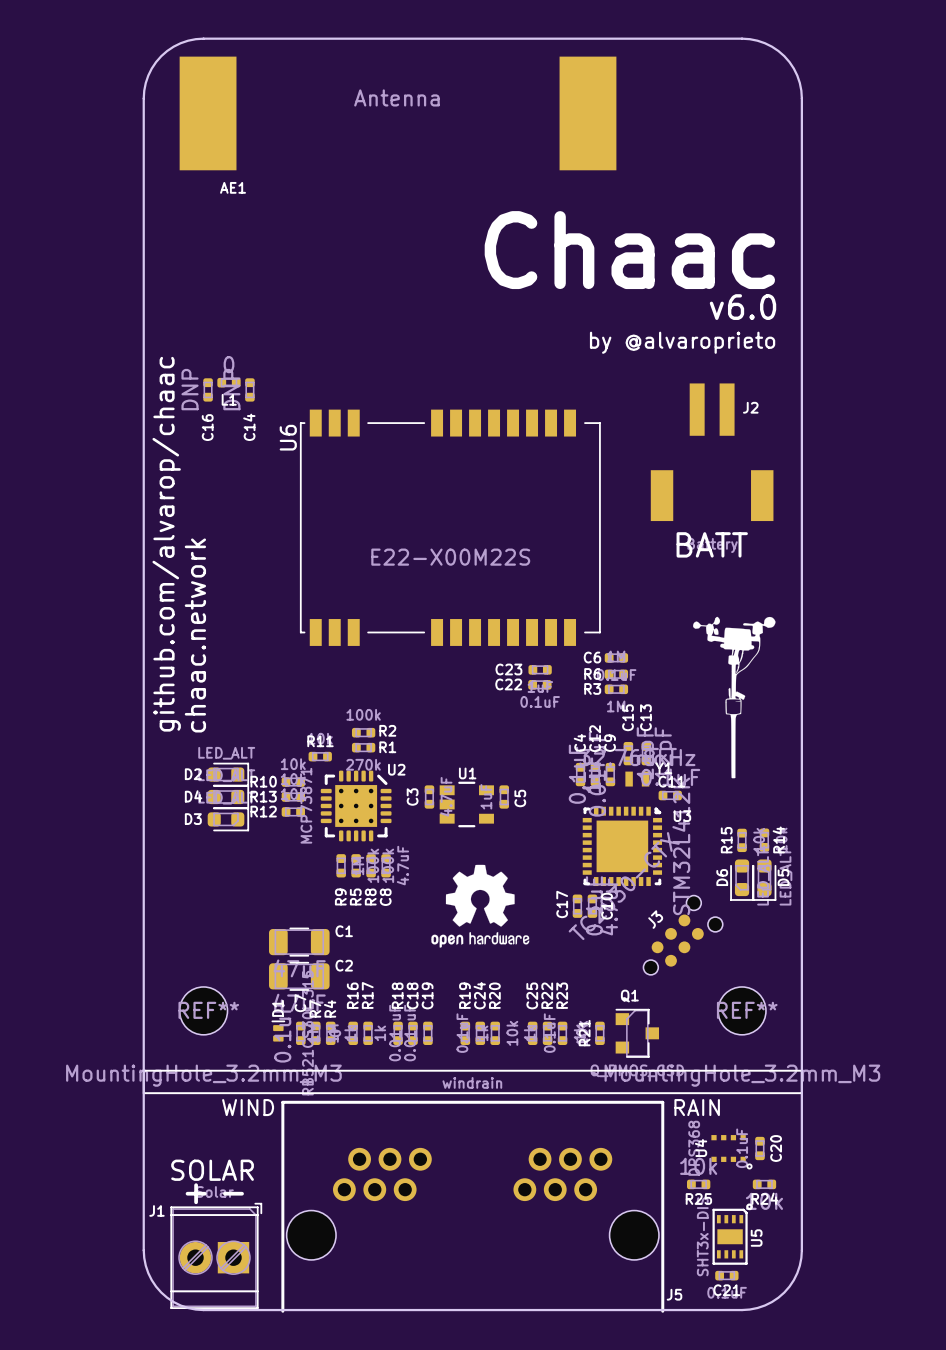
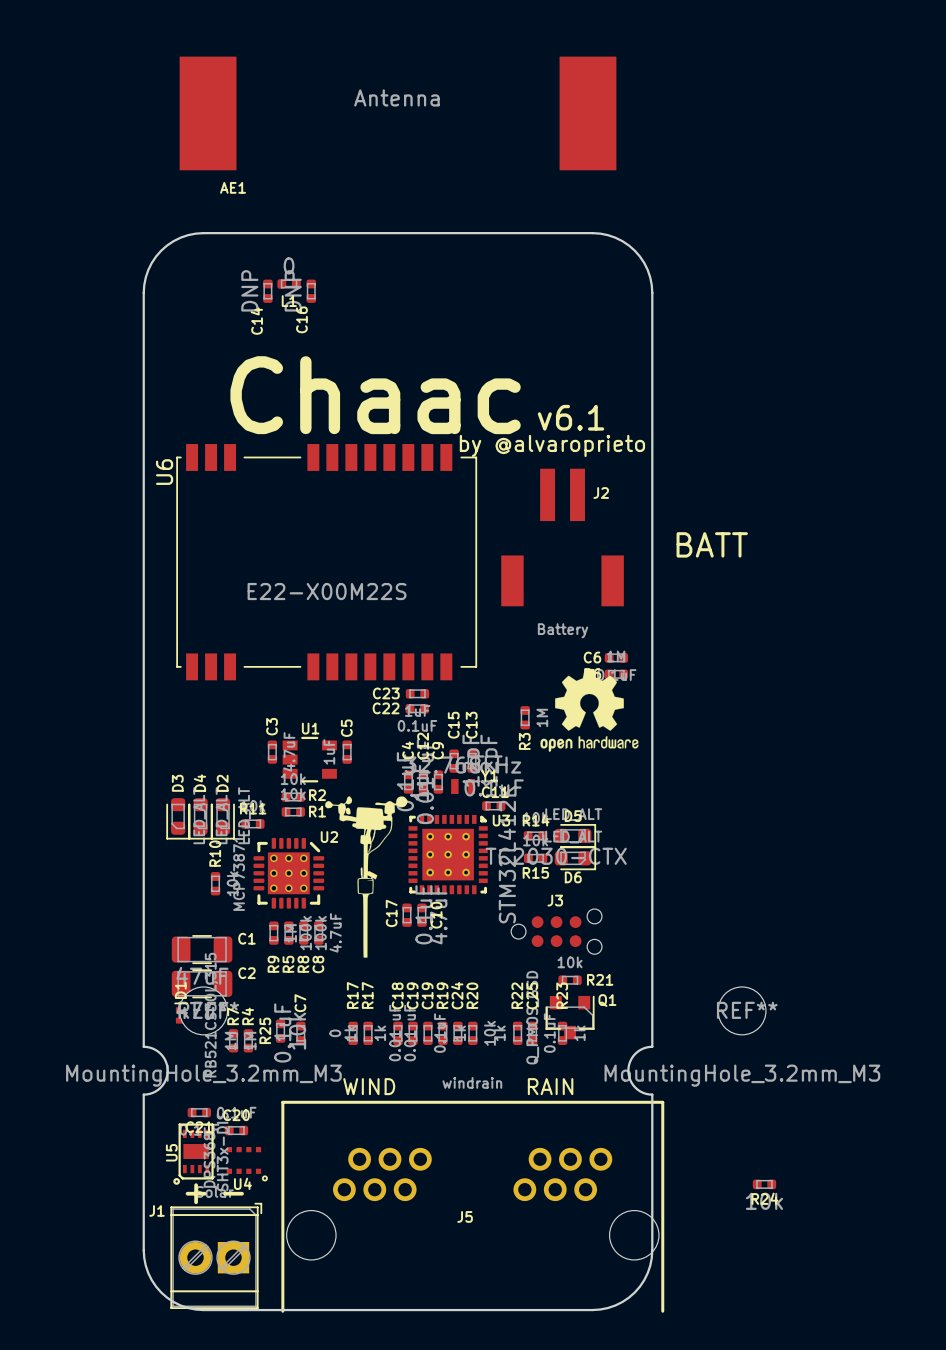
text position: Chaac (629, 250) -> Chaac (375, 395)
board edge: (143, 292) (144, 90) (148, 75) (156, 62) (167, 51) (188, 40) (203, 38) (742, 38) (757, 40) (778, 51) (789, 62) (797, 75) (801, 98) (801, 1258) (797, 1273) (789, 1286) (771, 1302) (757, 1308) (742, 1310) (592, 1310) -> (143, 292) (148, 270) (161, 250) (180, 237) (203, 233) (600, 233) (615, 237) (628, 245) (639, 256) (647, 270) (652, 292) (652, 1046) (643, 1048) (635, 1053) (630, 1061) (628, 1070) (630, 1079) (635, 1087) (643, 1092) (652, 1094) (652, 1250) (647, 1273) (634, 1292) (615, 1305) (592, 1310)
text: v6.0 (743, 307) -> none
text position: by @alvaroprieto (682, 342) -> by @alvaroprieto (552, 445)
L1 position: (229, 382) -> (289, 283)
C16 position: (208, 389) -> (311, 291)
C14 position: (249, 389) -> (267, 291)
text: none -> v6.1 (570, 417)
C16 name position: C16 (207, 427) -> C16 (301, 319)
C14 name position: C14 (249, 427) -> C14 (256, 321)
J2 position: (712, 452) -> (562, 537)
U6 position: (450, 527) -> (326, 562)
text: github.com/alvarop/chaac (166, 544) -> none
drawing: [693, 616, 776, 779] -> none
text: chaac.network (195, 635) -> none
C23 position: (540, 669) -> (417, 693)
C22 position: (539, 684) -> (417, 708)
R3 name position: R3 (592, 688) -> R3 (524, 741)
R3 rotation: 0° (616, 689) -> 90° clockwise (525, 717)
R3 position: (616, 689) -> (525, 717)
R2: 100k (363, 732) -> none
R1: 270k (363, 747) -> none
C15 position: (628, 753) -> (454, 761)
C13 position: (646, 753) -> (472, 761)
R11 position: (320, 756) -> (252, 823)
D2 rotation: 0° (228, 774) -> 90° clockwise (223, 818)
D2 position: (228, 774) -> (223, 818)
C4 position: (580, 774) -> (408, 782)
C12 position: (595, 774) -> (423, 782)
C9 position: (610, 774) -> (438, 782)
Y1 position: (637, 779) -> (463, 786)
R10 rotation: 0° (293, 782) -> 90° clockwise (215, 883)
R10 position: (293, 782) -> (215, 883)
C11 position: (670, 795) -> (493, 805)
R13 name: R13 (263, 796) -> R2 (317, 795)
drawing: none -> [325, 796, 408, 958]
D4 rotation: 0° (228, 797) -> 90° clockwise (200, 818)
D4 position: (228, 797) -> (200, 818)
C3 name position: C3 (412, 797) -> C3 (272, 726)
C3 position: (429, 797) -> (272, 752)
C5 position: (504, 797) -> (347, 752)
C5 name position: C5 (520, 798) -> C5 (346, 728)
U1 position: (466, 804) -> (309, 759)
U2 position: (356, 805) -> (288, 873)
U3 footprint: [582, 806, 663, 887] -> [408, 814, 488, 895]
R12 name: R12 (263, 811) -> R1 (317, 811)
D3 rotation: 0° (228, 819) -> 90° clockwise (178, 818)
D3 position: (228, 819) -> (178, 818)
R15 rotation: 0° (742, 840) -> 90° clockwise (535, 858)
R15 position: (742, 840) -> (535, 858)
R14 rotation: 0° (764, 840) -> 90° clockwise (535, 835)
R14 position: (764, 840) -> (535, 835)
R9 position: (341, 865) -> (273, 933)
R5 position: (356, 865) -> (288, 933)
R8 position: (371, 865) -> (303, 933)
C8 position: (386, 865) -> (318, 933)
D6 rotation: 0° (742, 880) -> 90° counterclockwise (575, 858)
D6 position: (742, 880) -> (575, 858)
D5 rotation: 0° (764, 880) -> 90° counterclockwise (575, 835)
D5 position: (764, 880) -> (575, 835)
drawing position: (480, 906) -> (589, 710)
C17 position: (577, 906) -> (406, 915)
C10 position: (592, 906) -> (421, 915)
J3 rotation: 0° (683, 935) -> 45° clockwise (556, 931)
J3 position: (683, 935) -> (556, 931)
C1 position: (299, 942) -> (202, 949)
C2 position: (299, 976) -> (202, 983)
R16 name: R16 (352, 995) -> R17 (352, 995)
R18 name: R18 (397, 995) -> C18 (397, 995)
C18 name: C18 (412, 995) -> C19 (412, 995)
D1 position: (278, 1031) -> (181, 1013)
R7 position: (315, 1033) -> (233, 1040)
R4 position: (330, 1033) -> (248, 1040)
R19 position: (465, 1033) -> (442, 1033)
C24 position: (480, 1033) -> (457, 1033)
R20 position: (495, 1033) -> (472, 1033)
R22 position: (547, 1033) -> (517, 1033)
R21 name position: R21 (584, 1033) -> R21 (600, 979)
R21 rotation: 0° (599, 1033) -> 90° clockwise (570, 980)
R21 position: (599, 1033) -> (570, 980)
Q1 rotation: 0° (637, 1033) -> 90° clockwise (570, 1017)
Q1 position: (637, 1033) -> (570, 1017)
board edge: (143, 1046) (143, 1094) -> (143, 1046) (152, 1048) (160, 1053) (165, 1061) (167, 1070) (165, 1079) (160, 1087) (152, 1092) (143, 1094)
line: (143, 1070) (801, 1070) (801, 1093) (143, 1093) (143, 1070) -> none
text position: WIND (248, 1107) -> WIND (369, 1086)
text position: RAIN (697, 1107) -> RAIN (550, 1086)
U4 name rotation: 0° (701, 1148) -> 90° clockwise (242, 1183)
U4 name position: U4 (701, 1148) -> U4 (242, 1183)
C20 rotation: 0° (759, 1148) -> 90° clockwise (236, 1130)
C20 position: (759, 1148) -> (236, 1130)
U4 position: (731, 1152) -> (247, 1164)
text: SOLAR (212, 1170) -> none
R25 rotation: 0° (698, 1184) -> 90° clockwise (280, 1031)
R25 position: (698, 1184) -> (280, 1031)
U5 rotation: 0° (732, 1234) -> 180° (193, 1154)
U5 position: (732, 1234) -> (193, 1154)
C21 position: (726, 1275) -> (199, 1112)
J5 name position: J5 (674, 1294) -> J5 (465, 1216)

